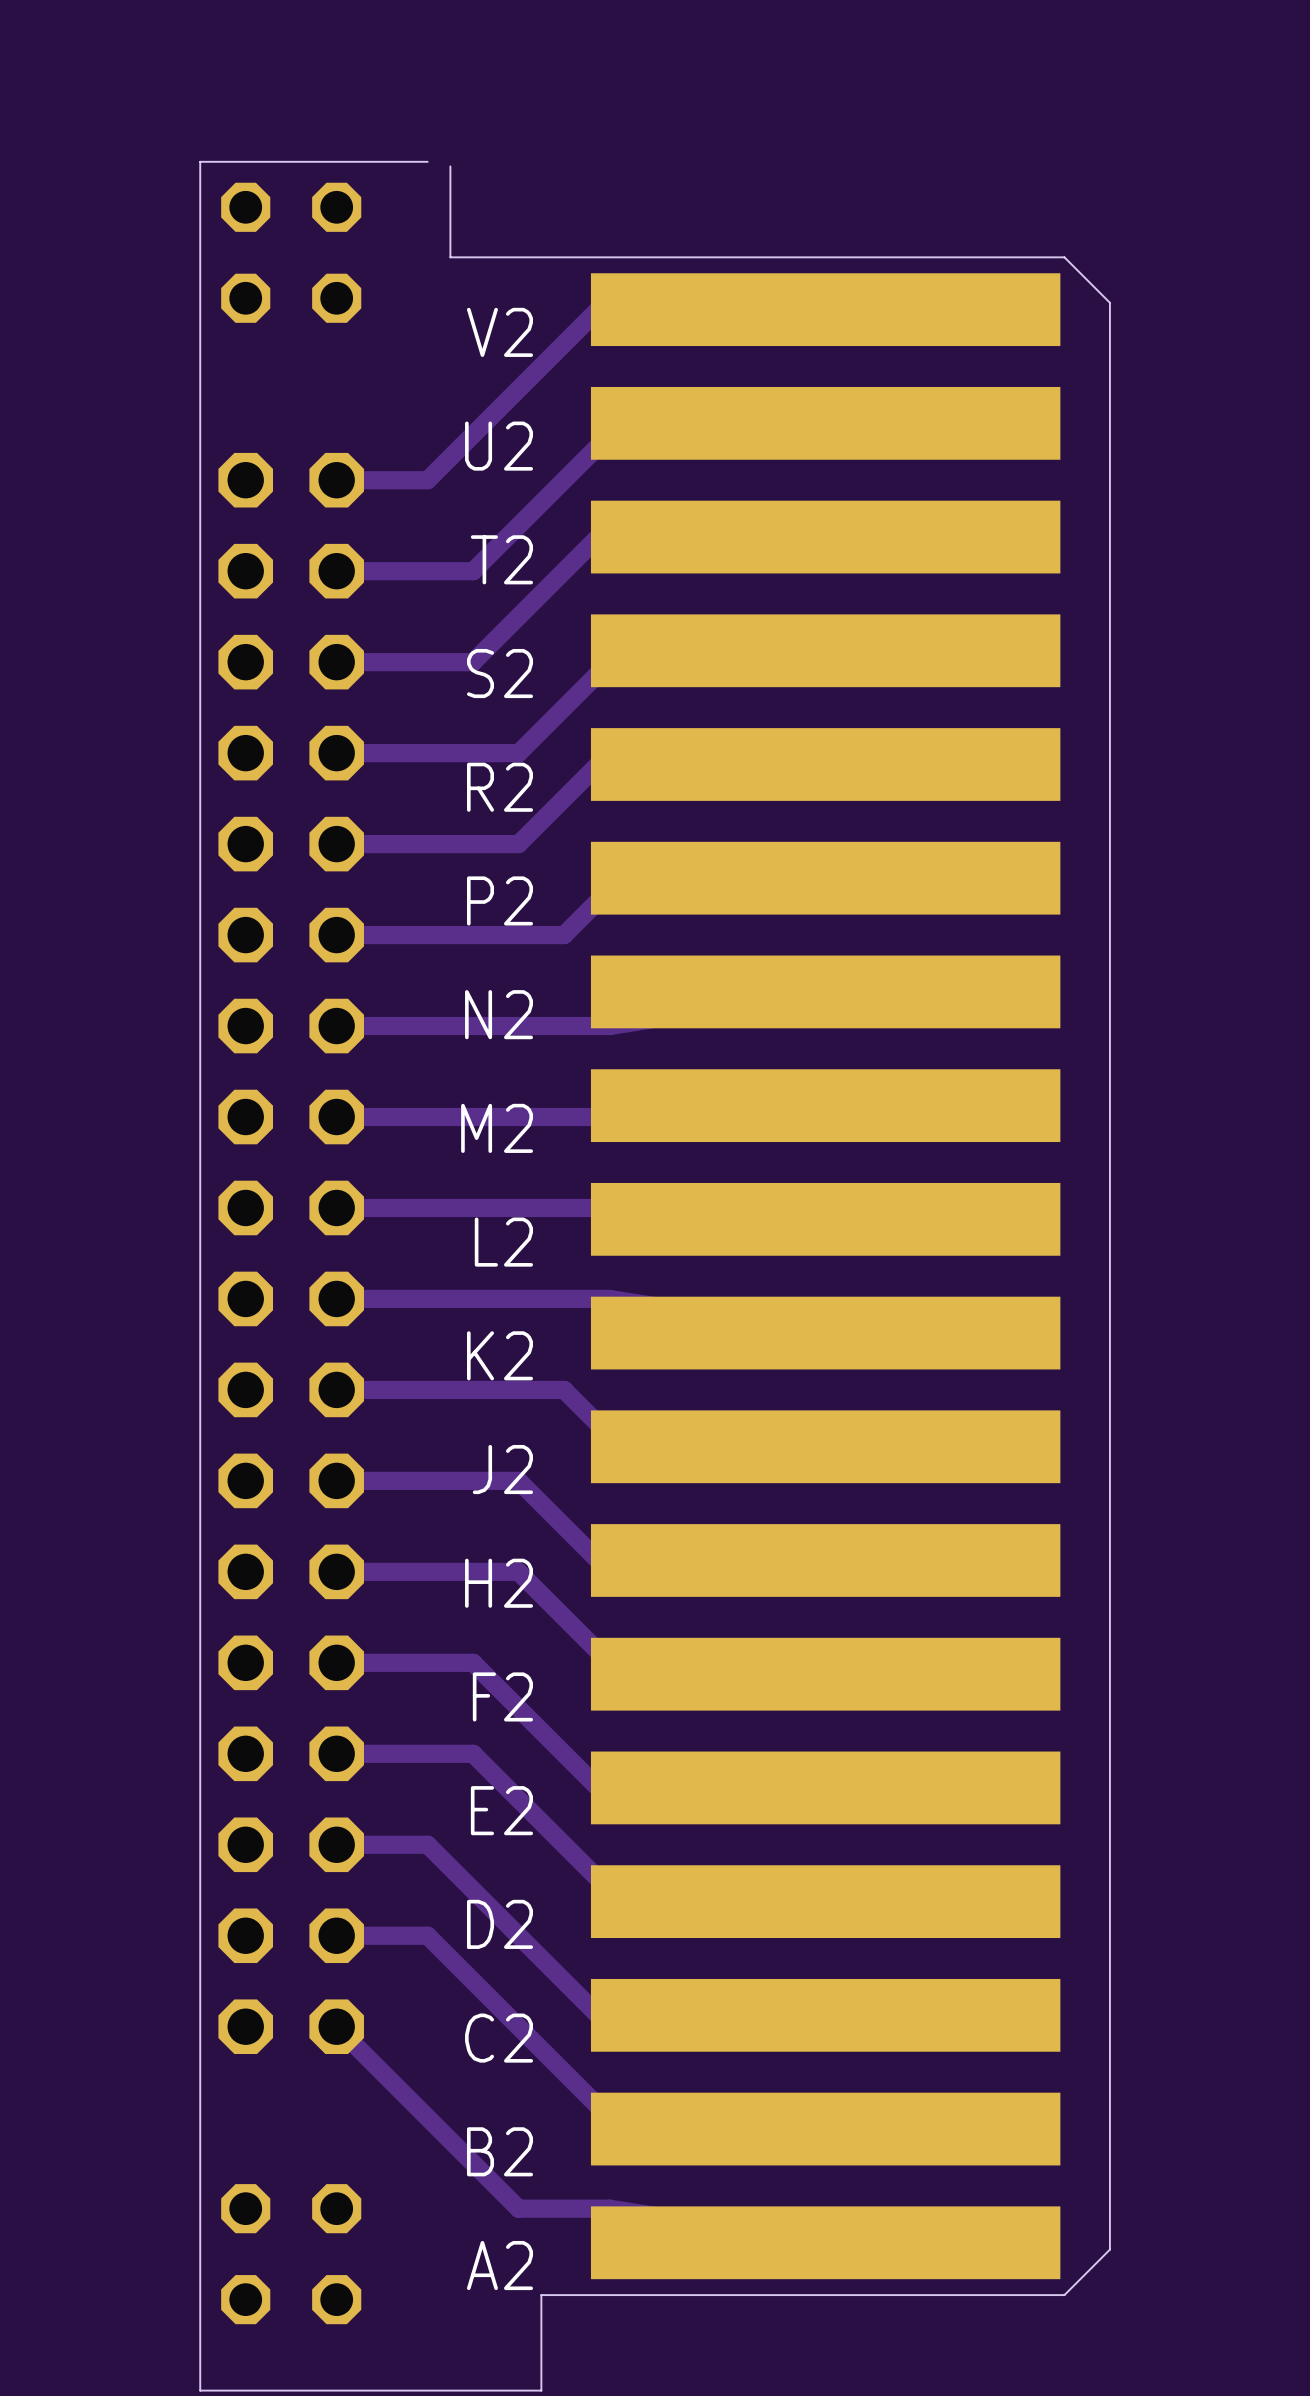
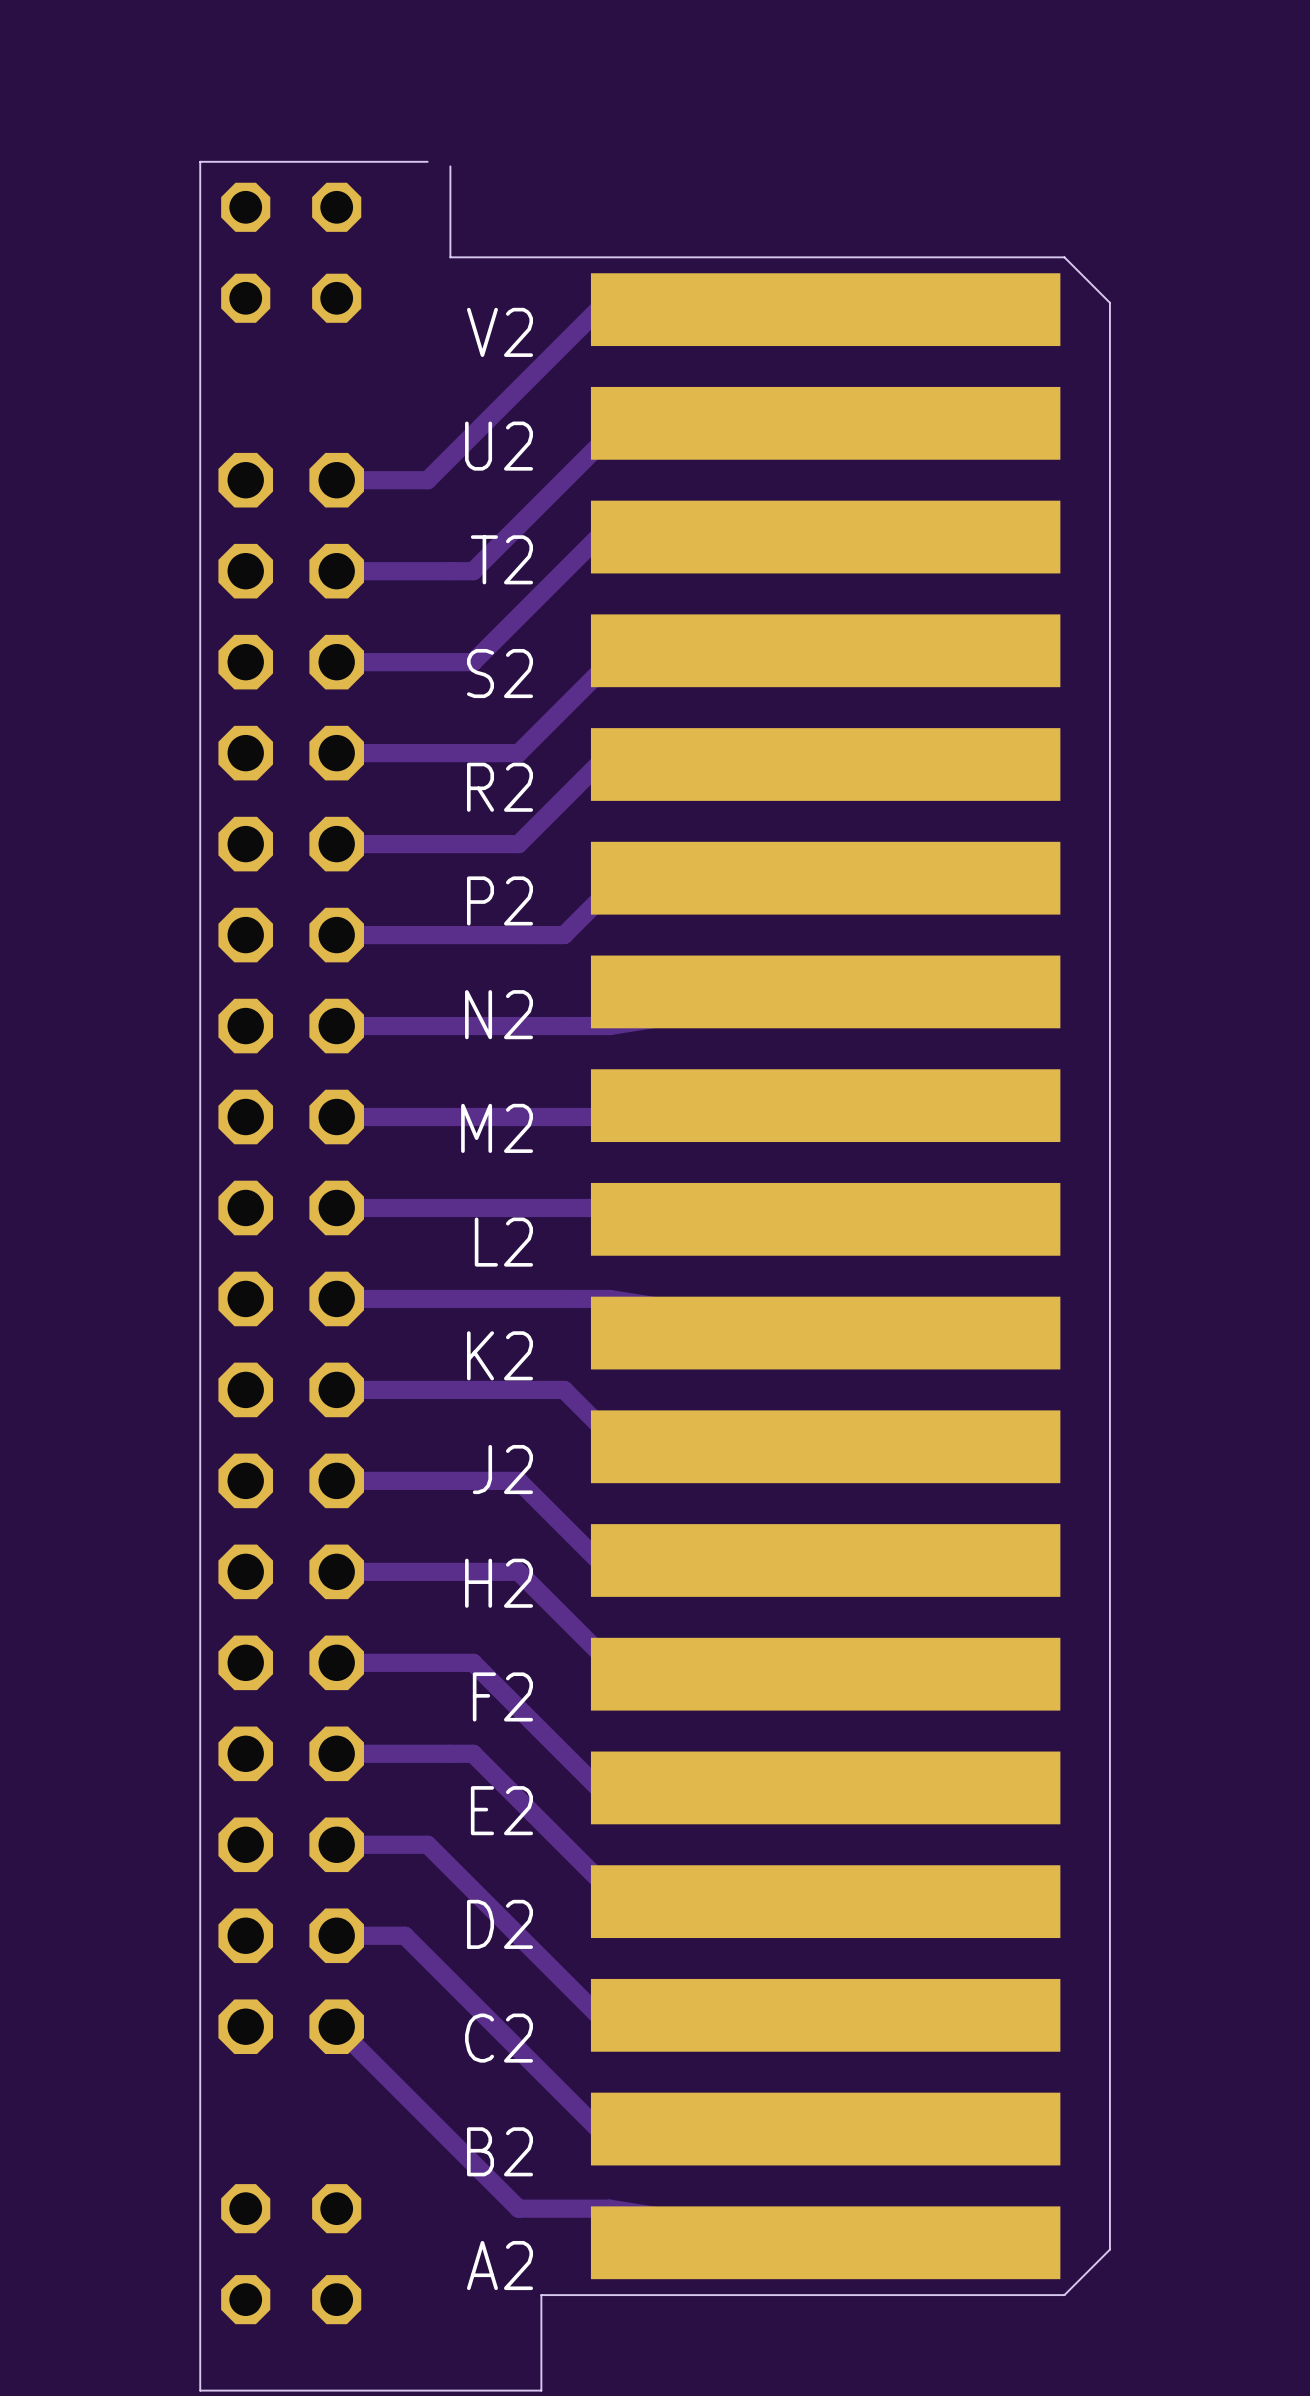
track: (404, 1935) (427, 1935) (609, 2117) (825, 2129) -> (404, 1935) (609, 2140) (825, 2129)

